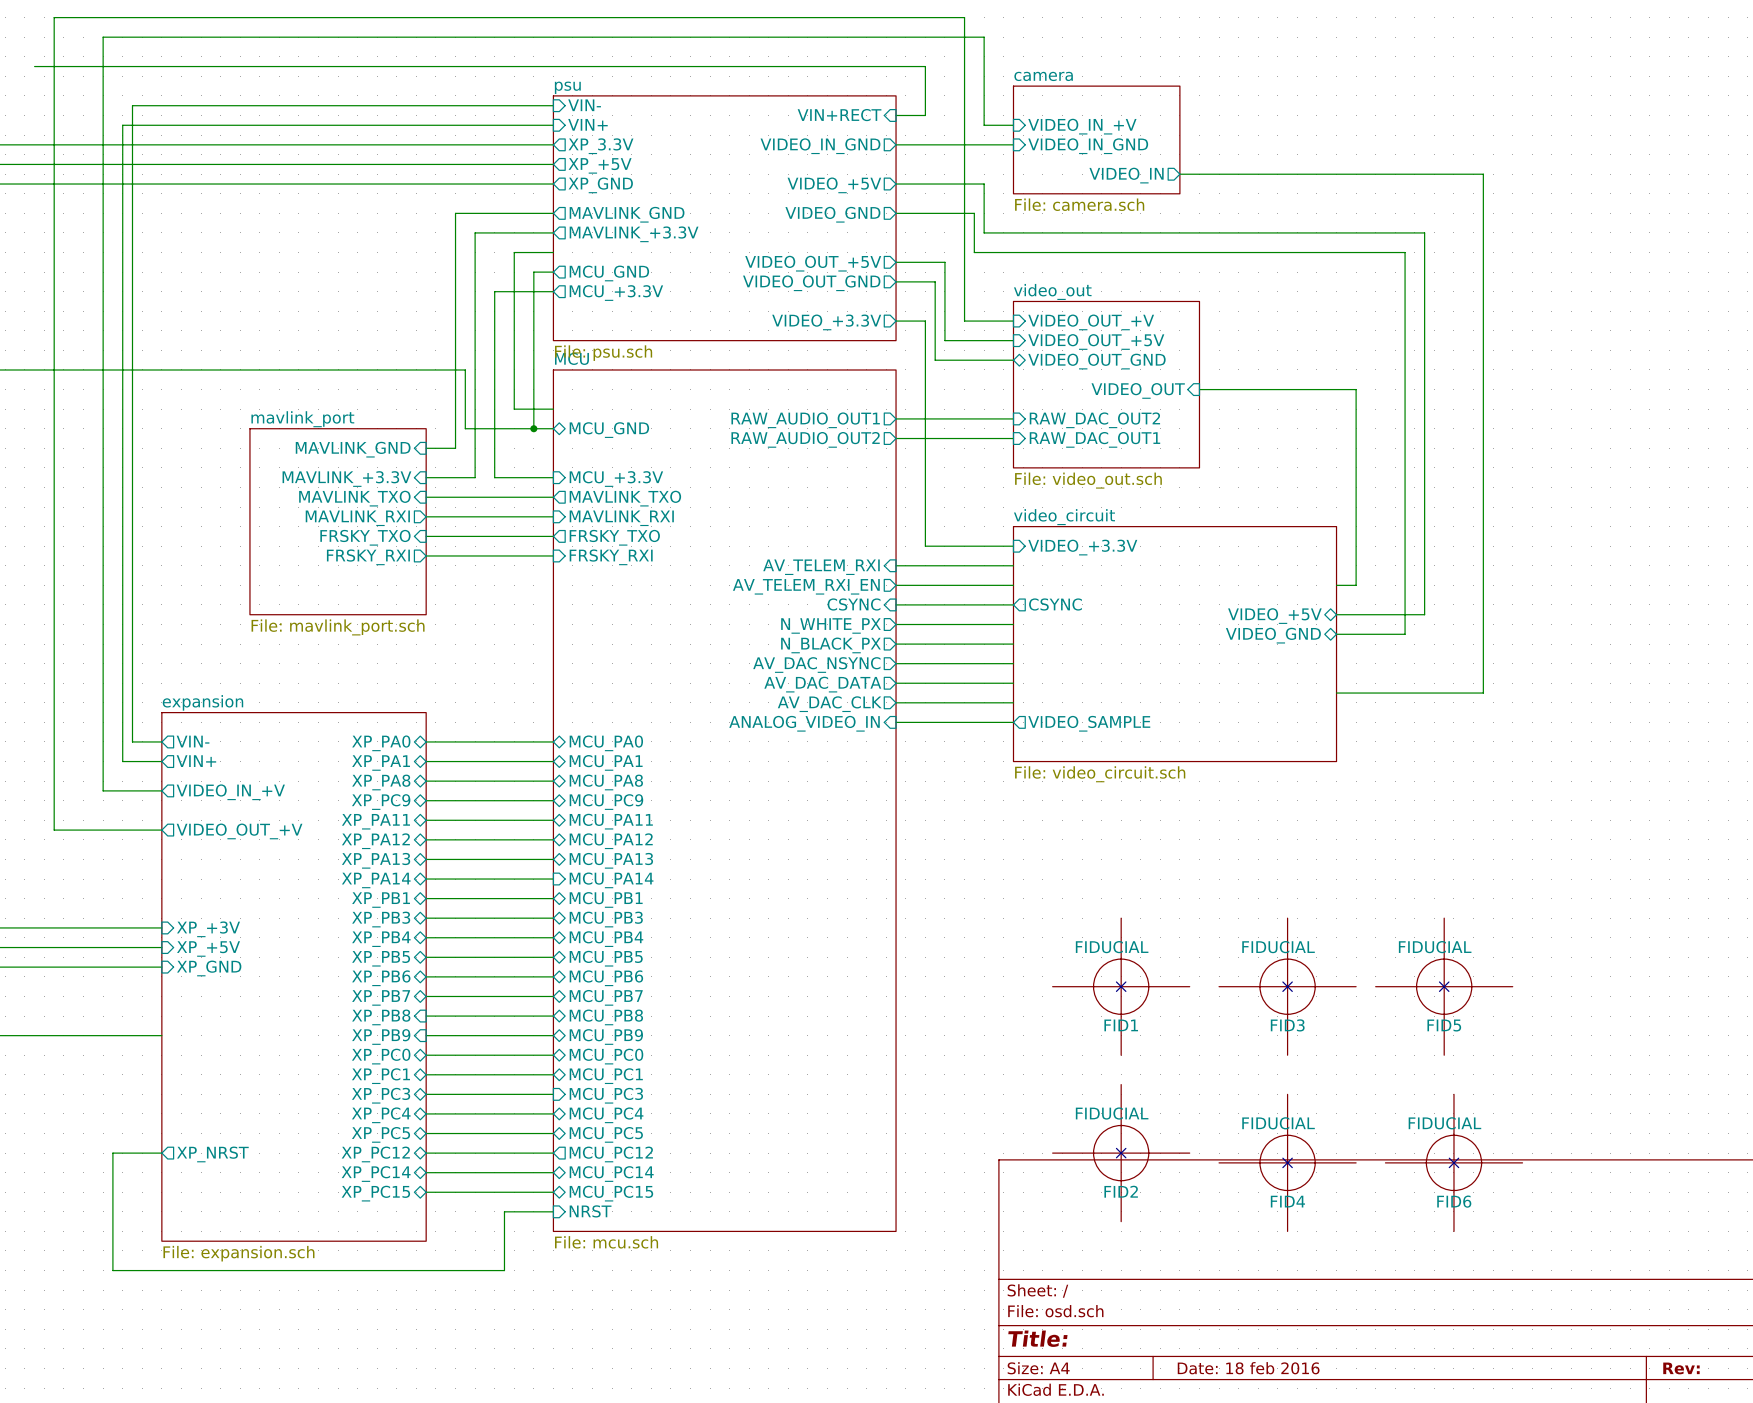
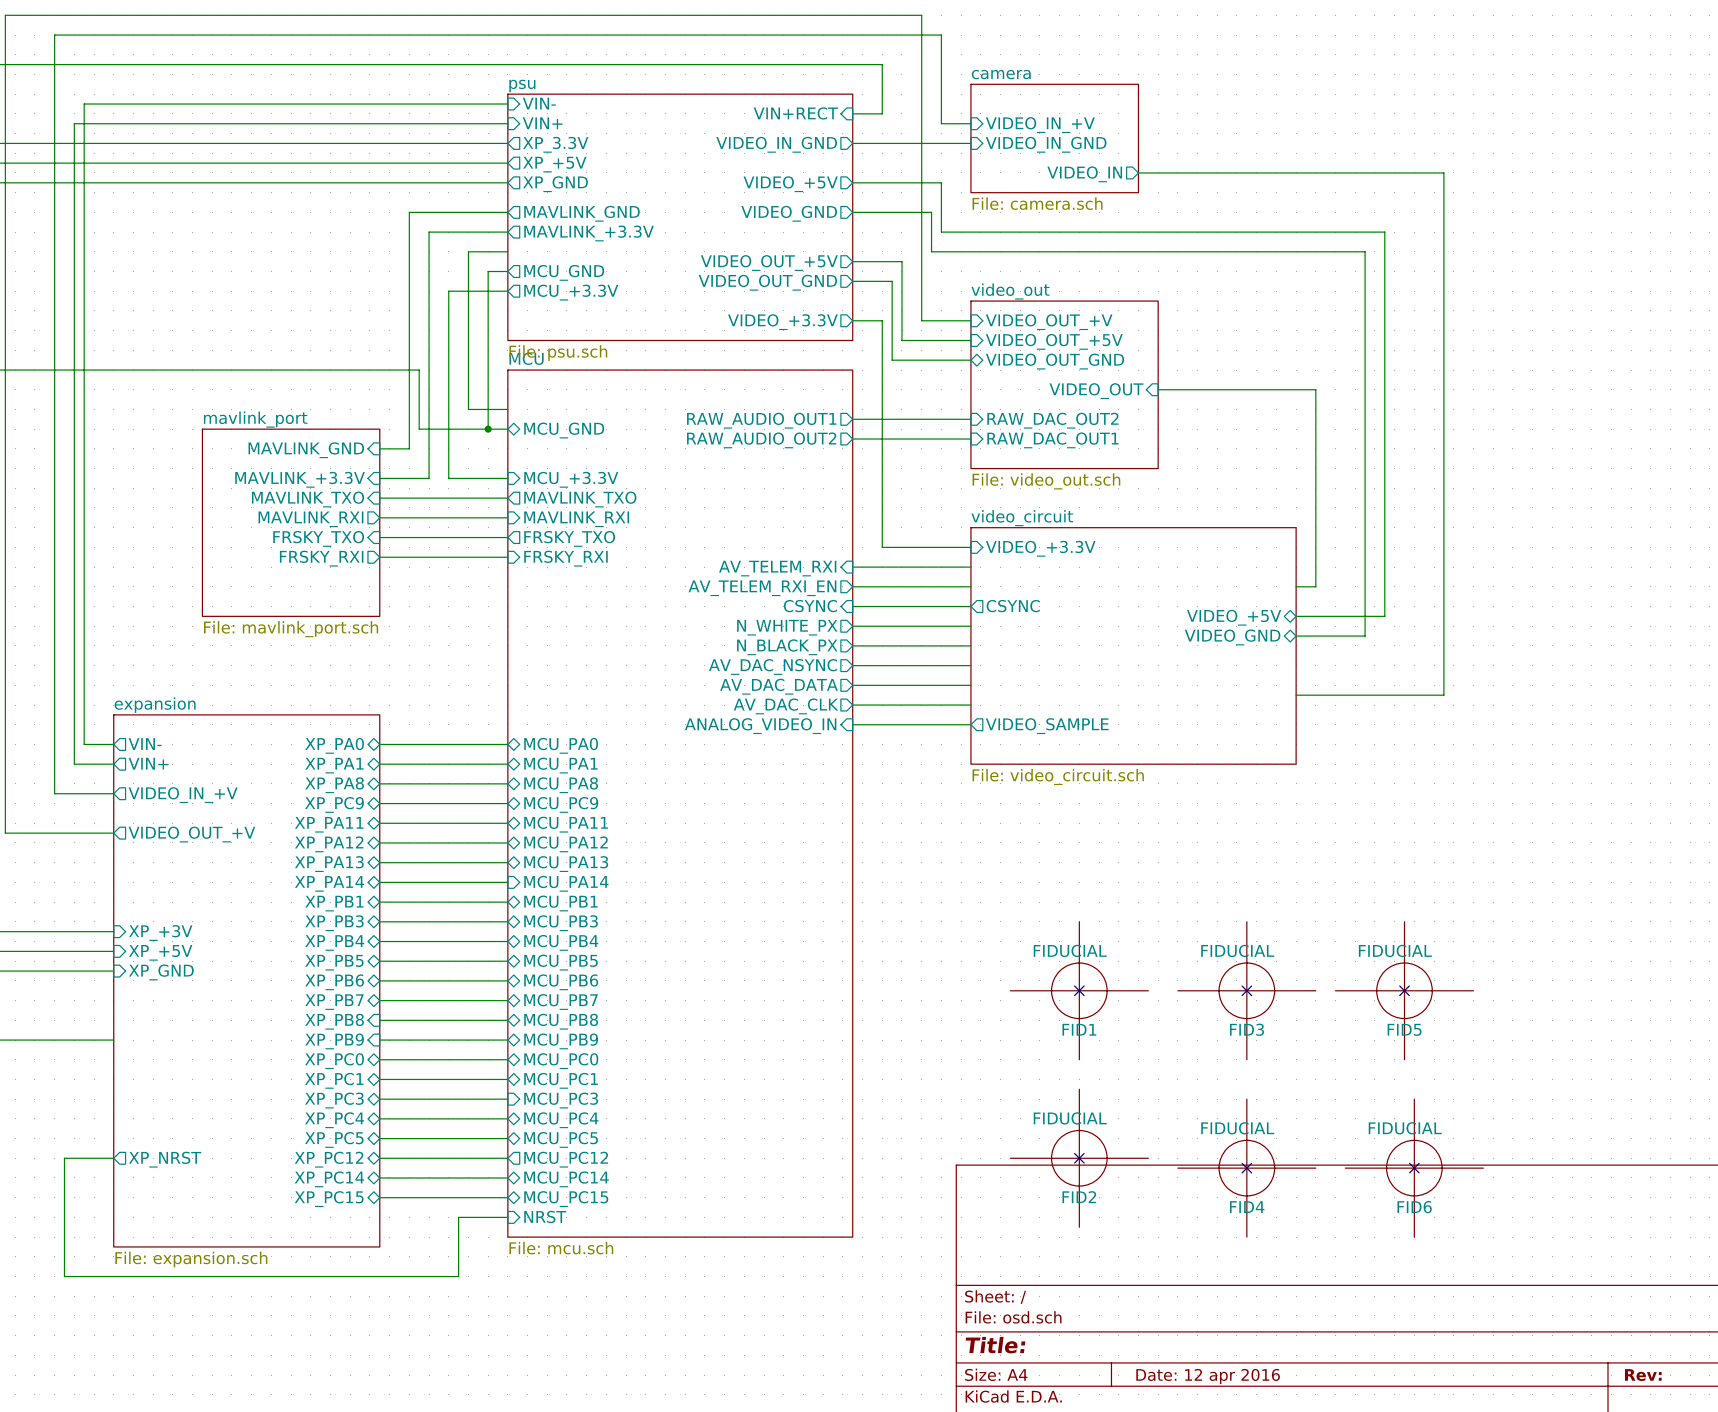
title block: Date: 18 feb 2016 (1248, 1368) -> Date: 12 apr 2016 (1208, 1376)

